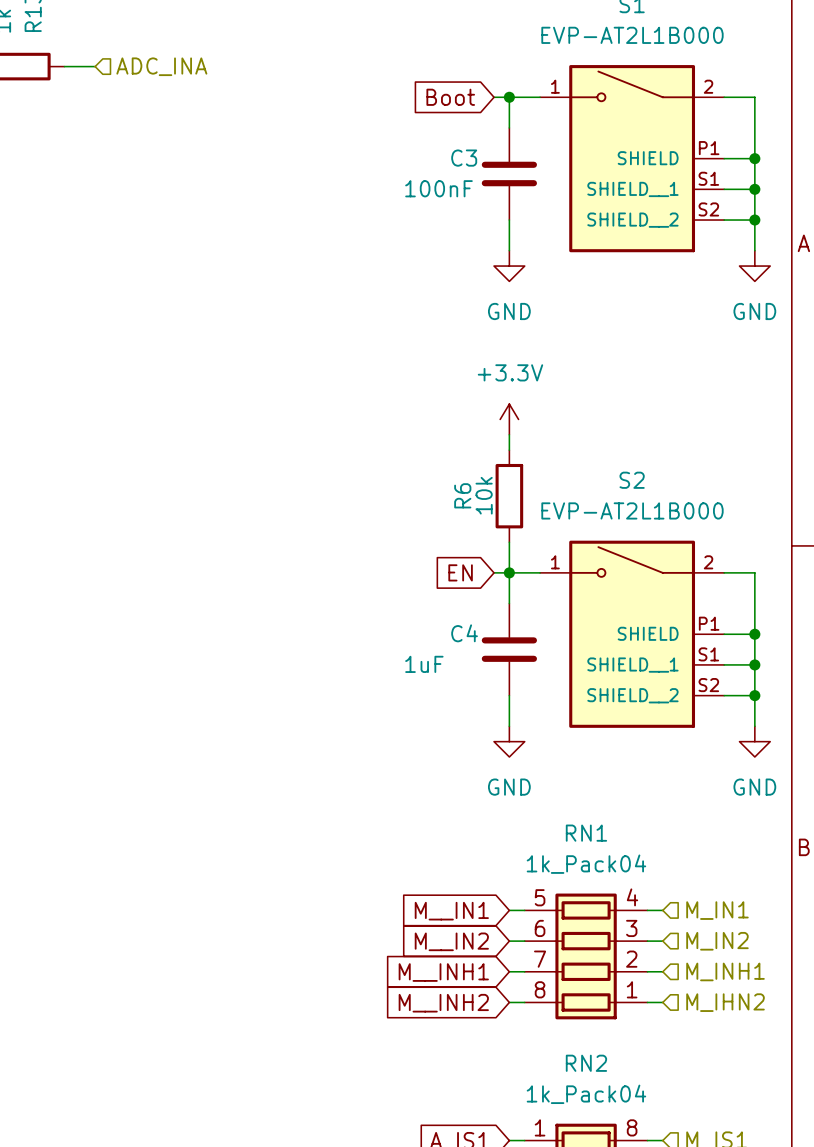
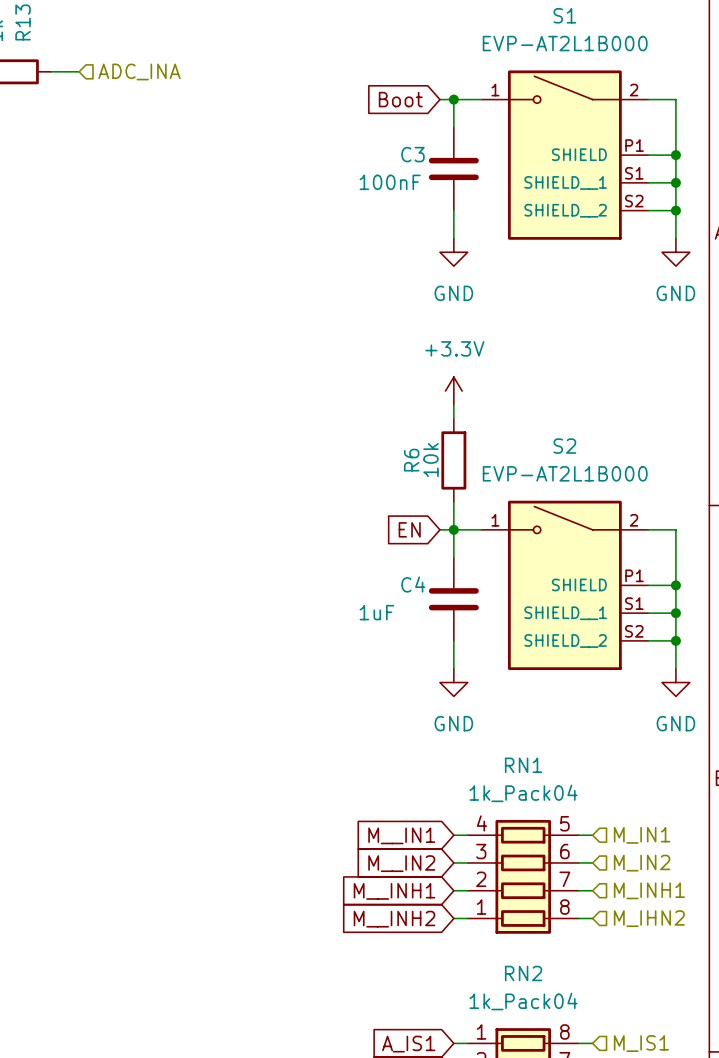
RN1 flip: as is (586, 956) -> left-right (523, 876)

